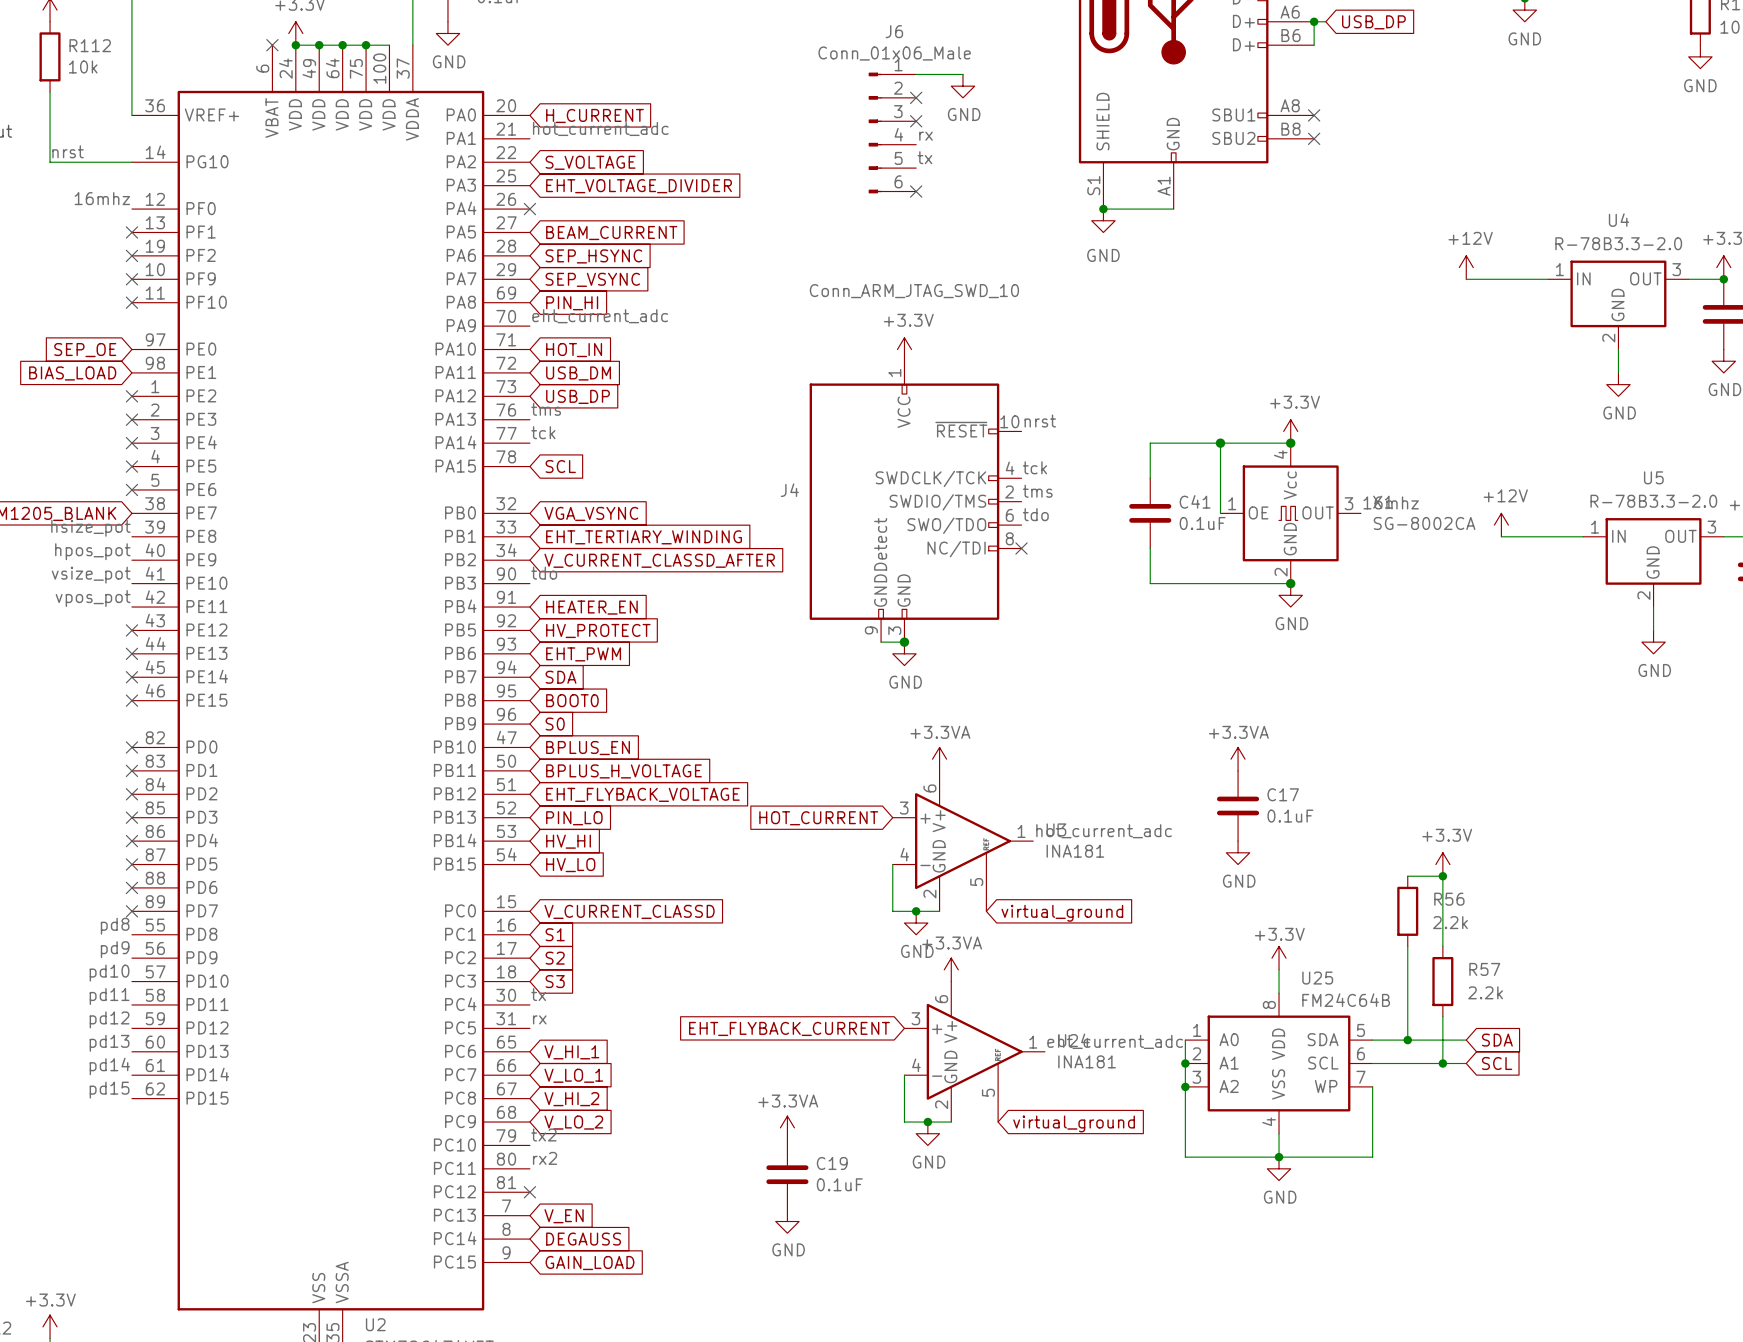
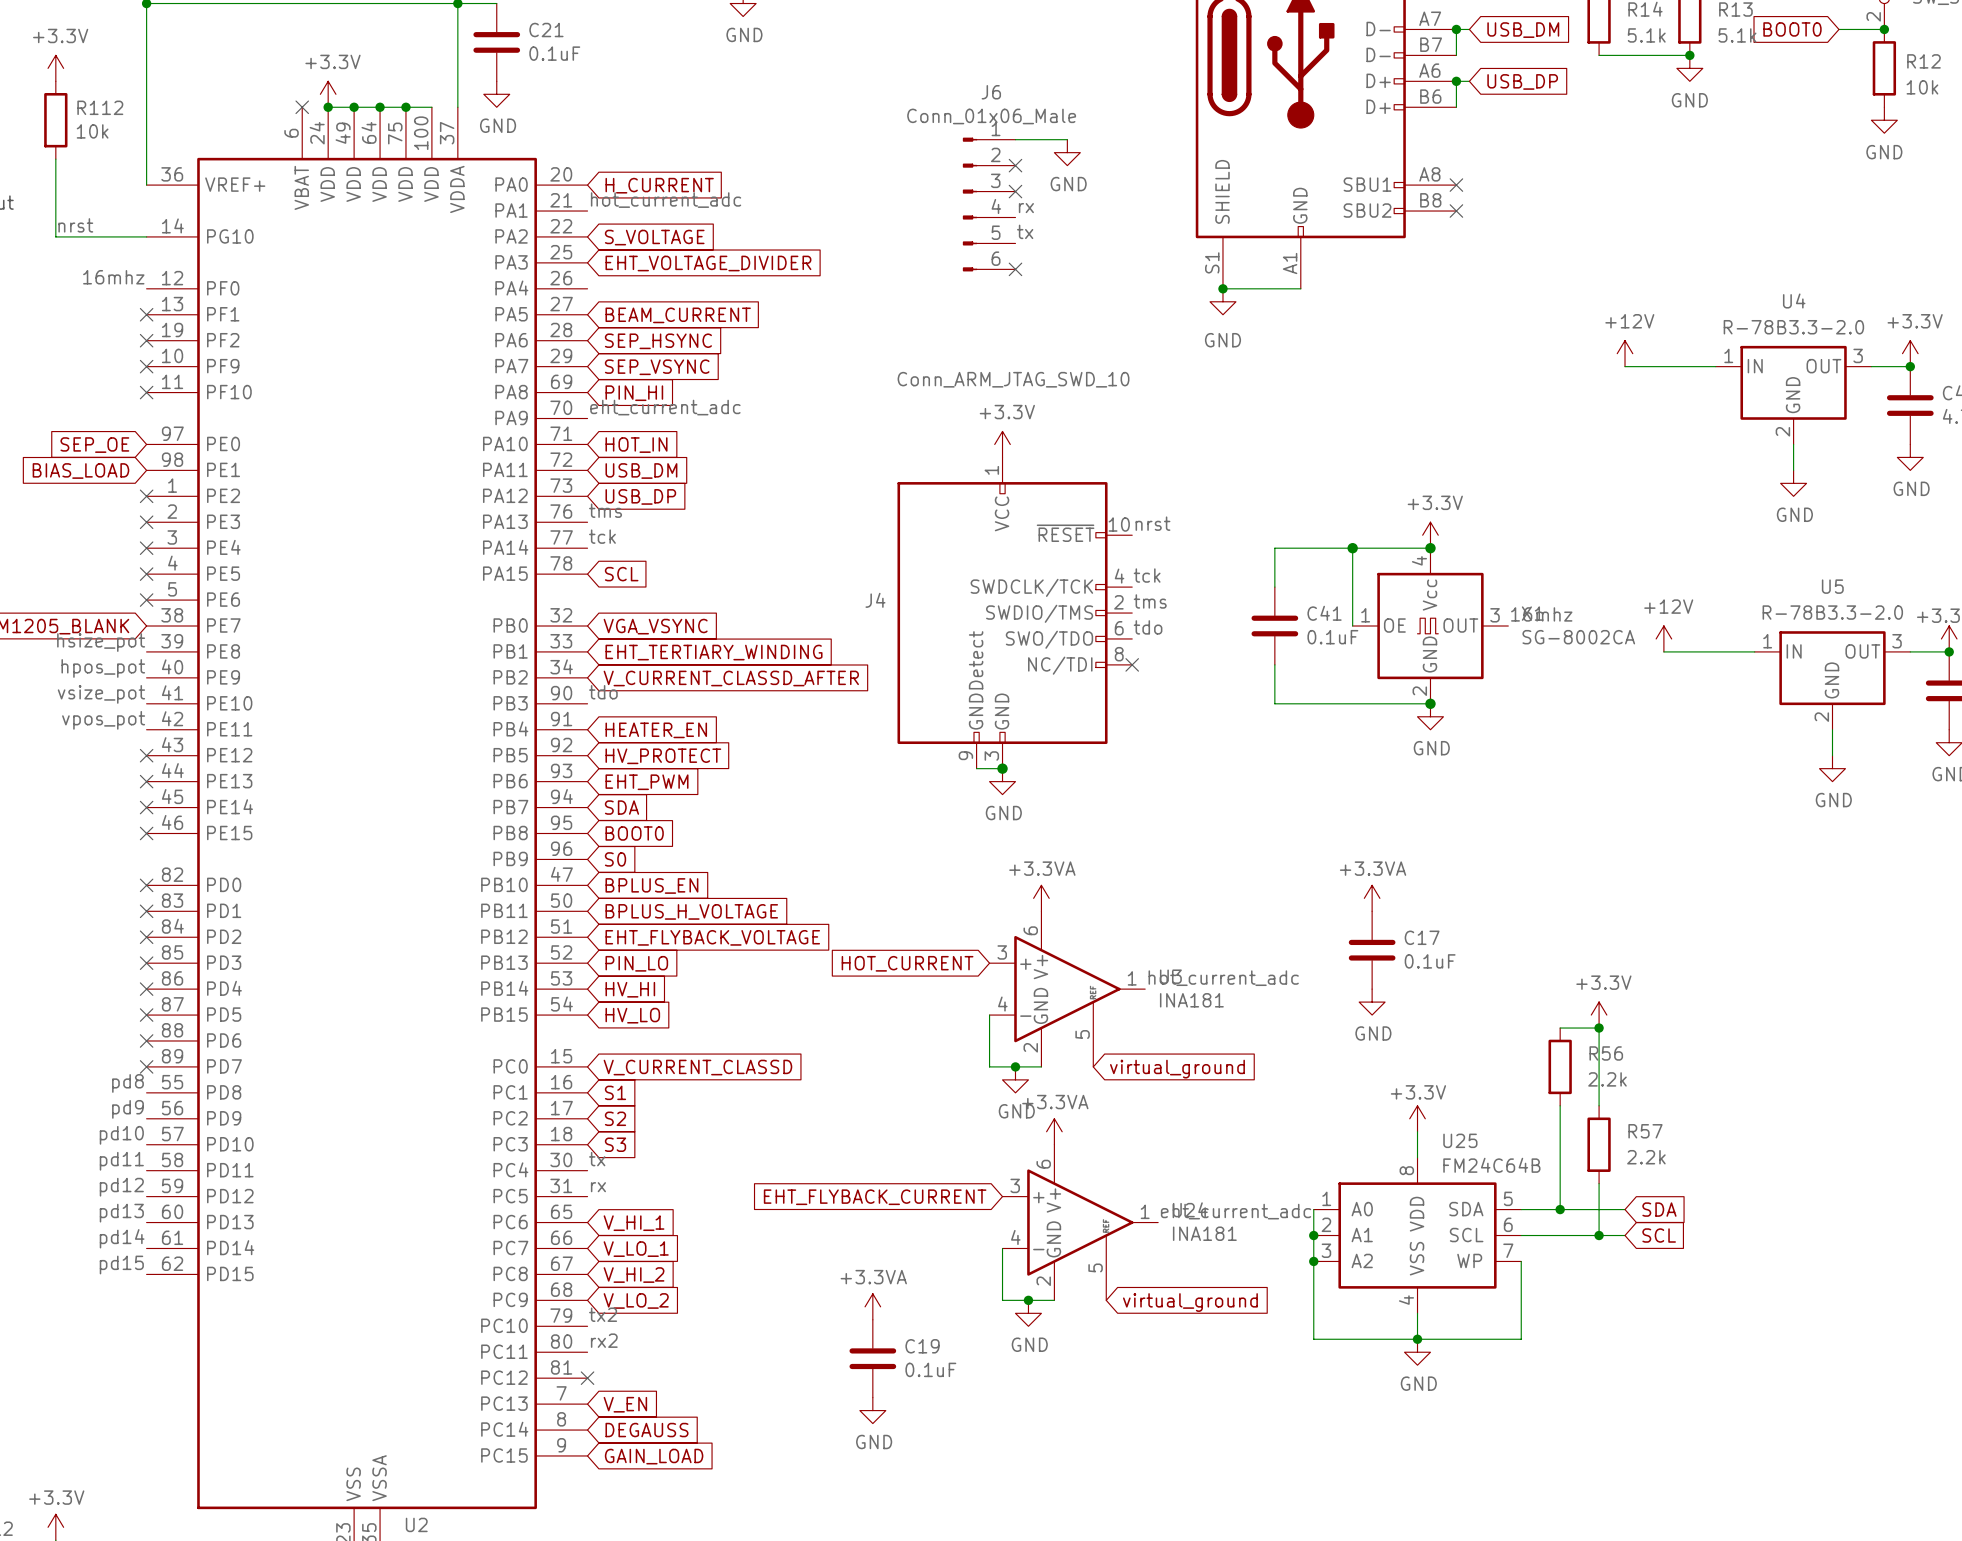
no-connect mark: (529, 209) -> none

